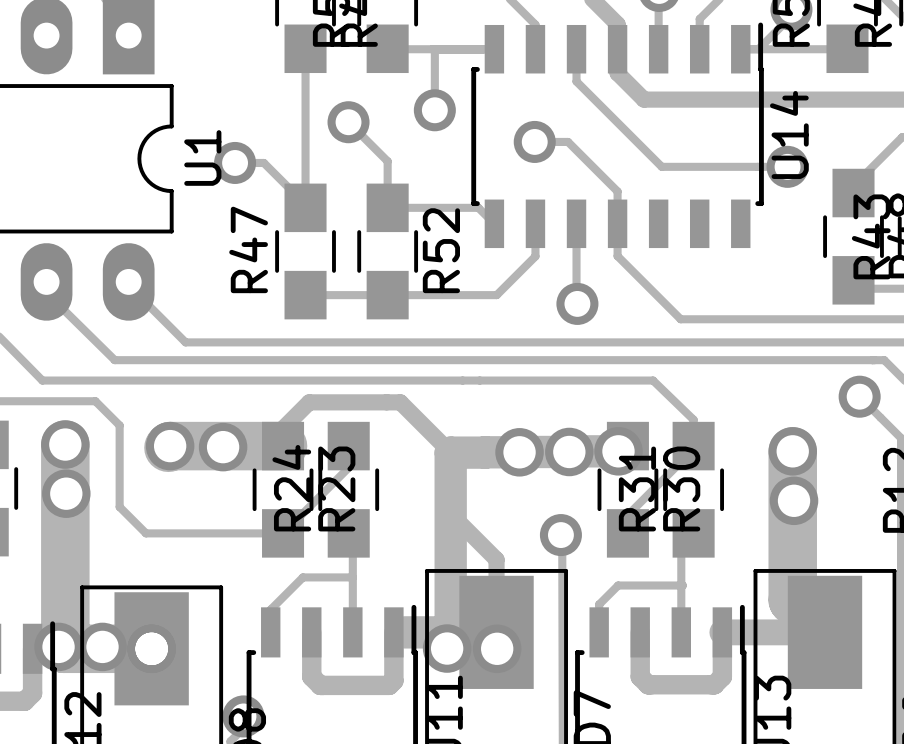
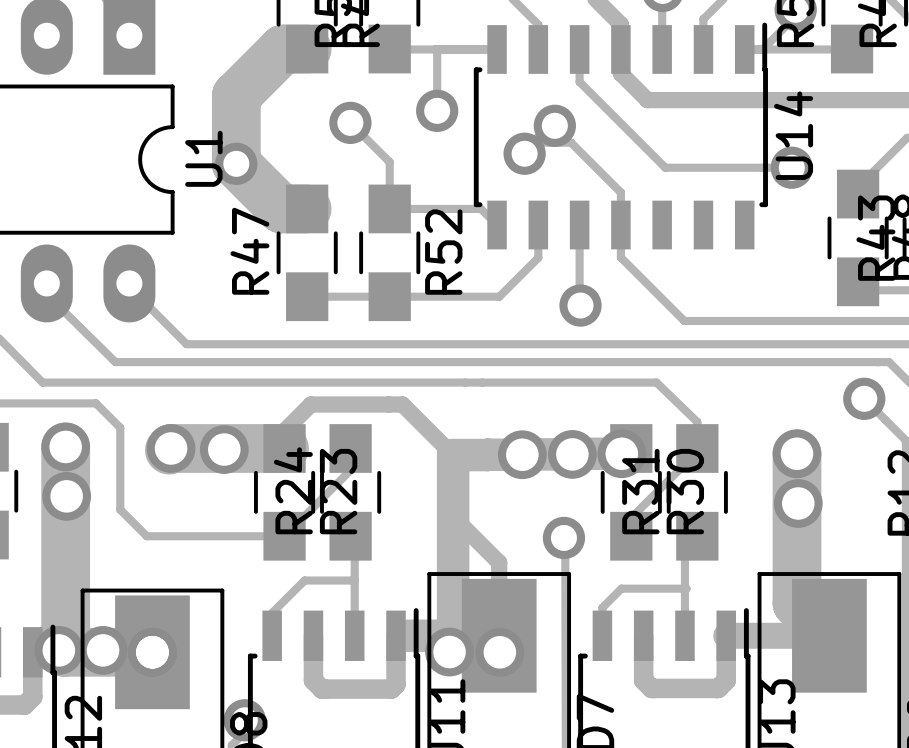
track: (305, 48) (305, 207) -> (307, 49) (283, 49) (236, 95) (236, 163) (281, 208) (307, 208)
via: none -> (554, 125)
via: (534, 141) -> none
via: none -> (524, 153)
track: (235, 162) (263, 162) (305, 204) -> none

